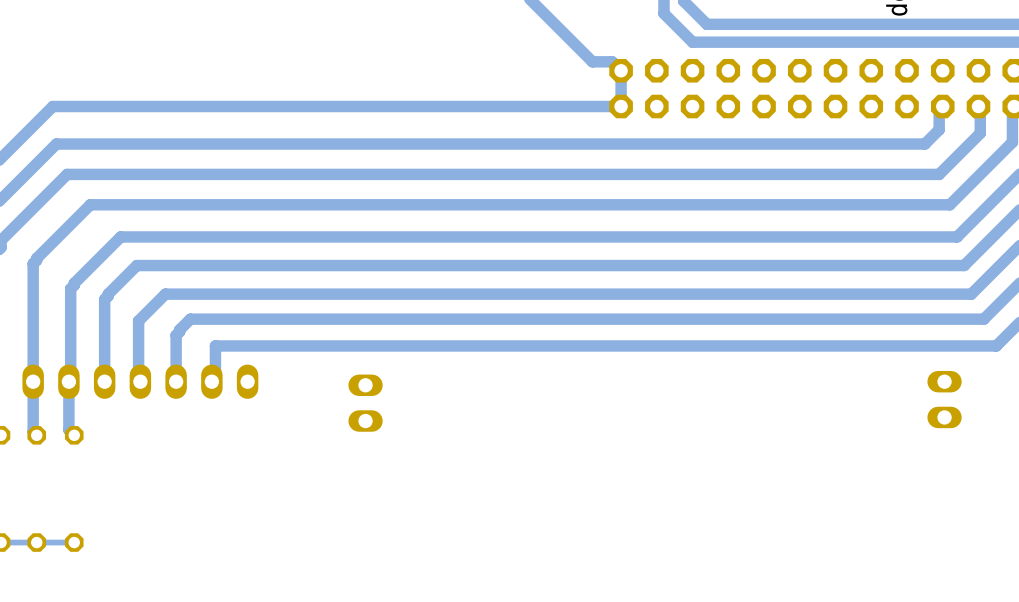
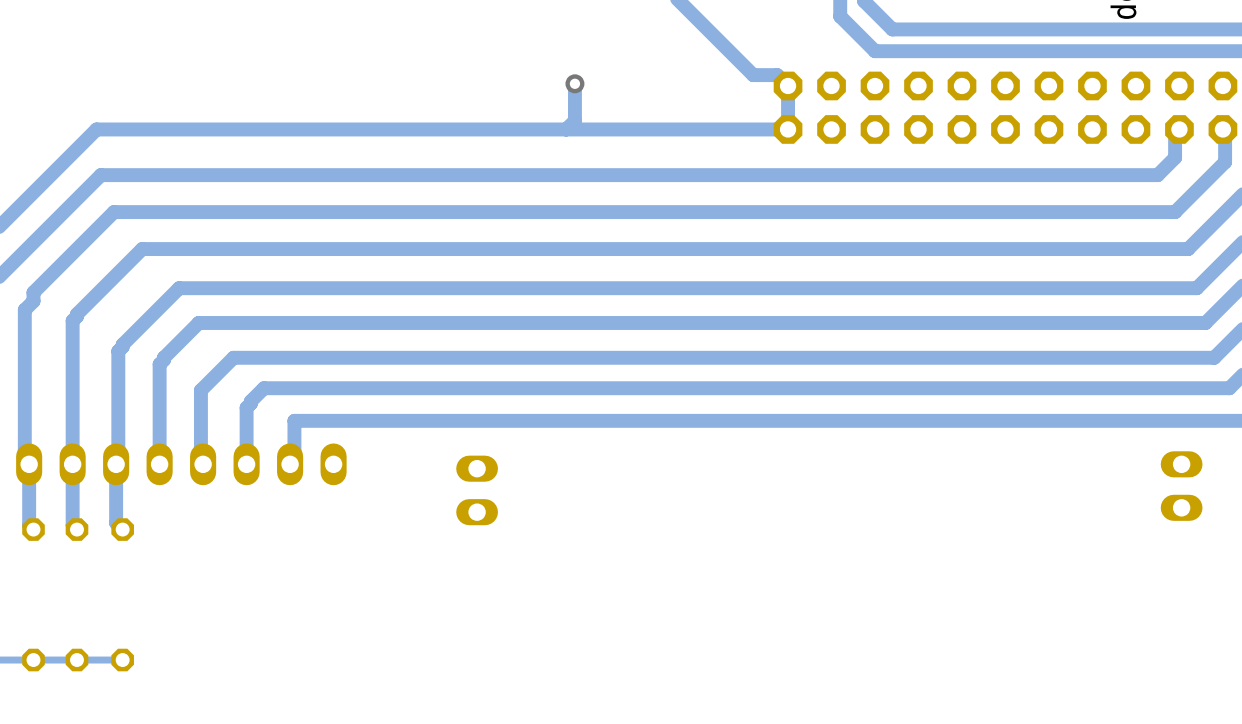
track: none -> (574, 83) (574, 120) (566, 129)
via: none -> (574, 83)

